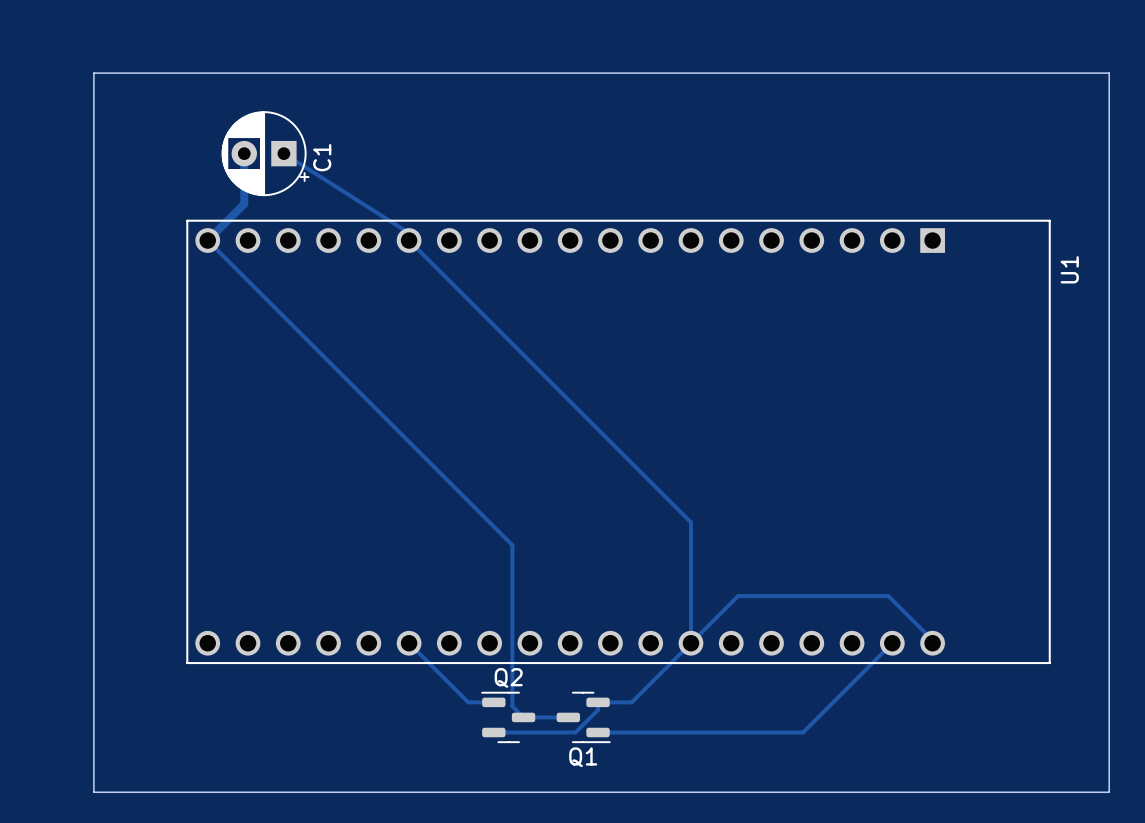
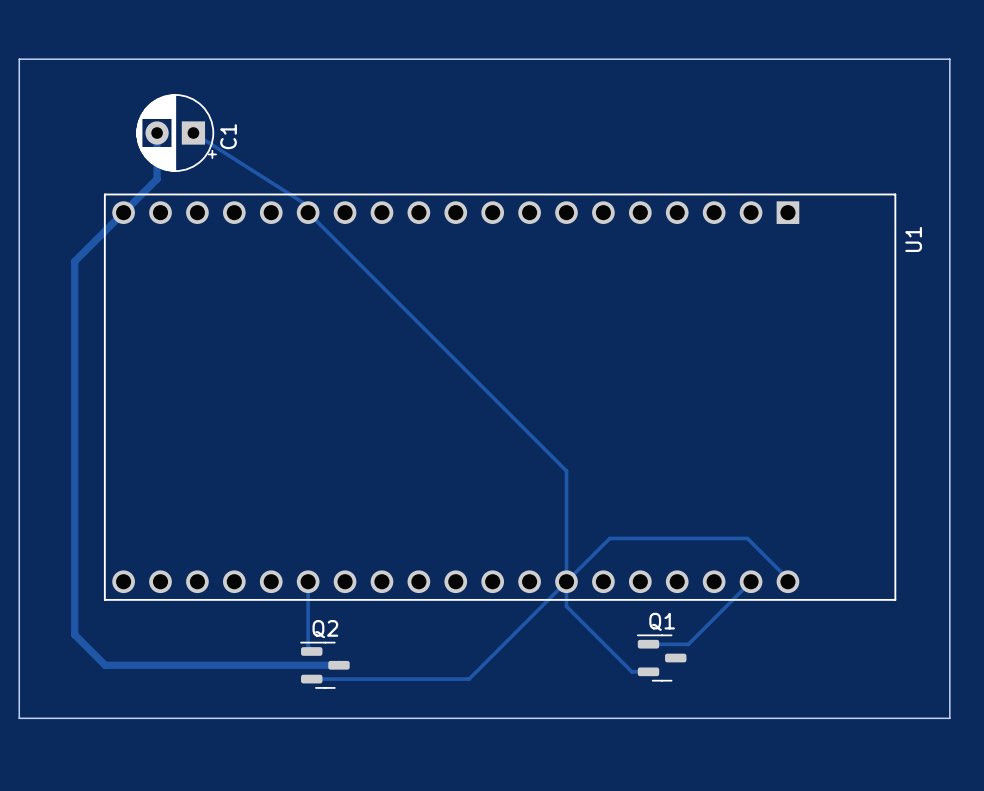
track: (207, 240) (512, 545) (512, 706) (523, 717) (568, 717) -> (123, 212) (74, 261) (74, 634) (105, 665) (338, 665)
track: (409, 643) (468, 702) (493, 702) -> (308, 581) (308, 646) (313, 651) (311, 651)
track: none -> (566, 581) (566, 606) (631, 671) (648, 671)
track: (631, 702) (598, 702) (598, 710) (575, 732) (493, 732) -> (512, 635) (469, 679) (311, 679)
track: (823, 711) (803, 732) (598, 732) -> (688, 644) (648, 644)
Q2 position: (508, 717) -> (324, 665)
Q1 rotation: 0° (583, 717) -> 180° (661, 658)
Q1 position: (583, 717) -> (661, 658)

